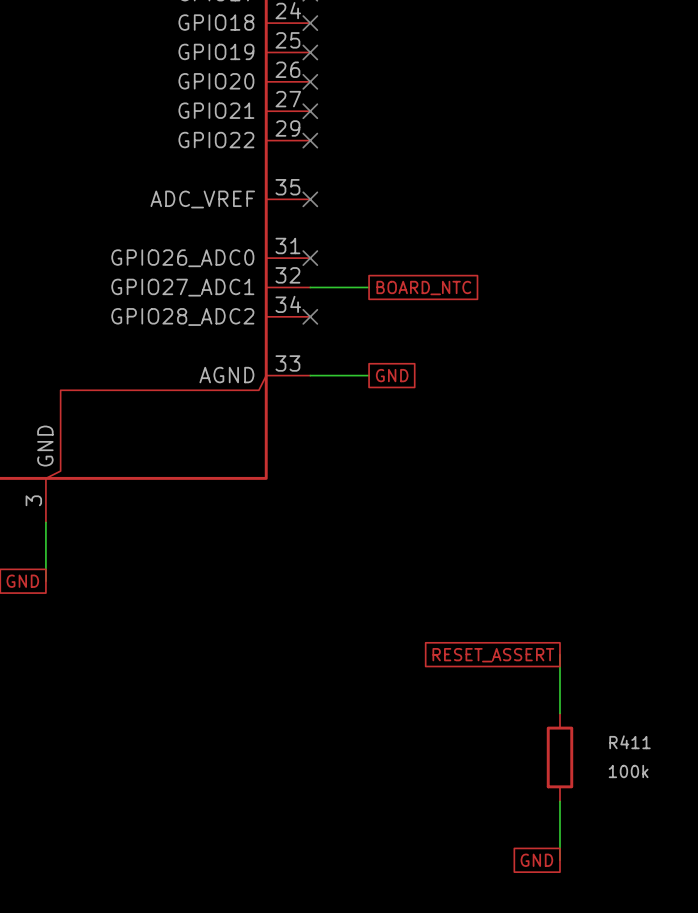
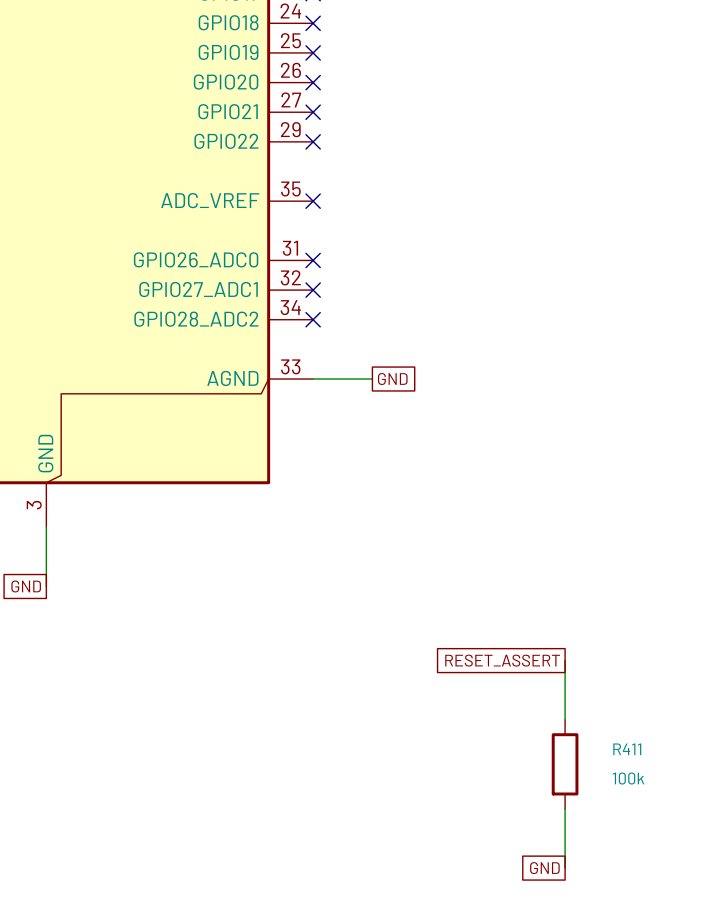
wire: (310, 287) (369, 287) -> none
no-connect mark: none -> (313, 290)
global label: BOARD_NTC (423, 288) -> none

